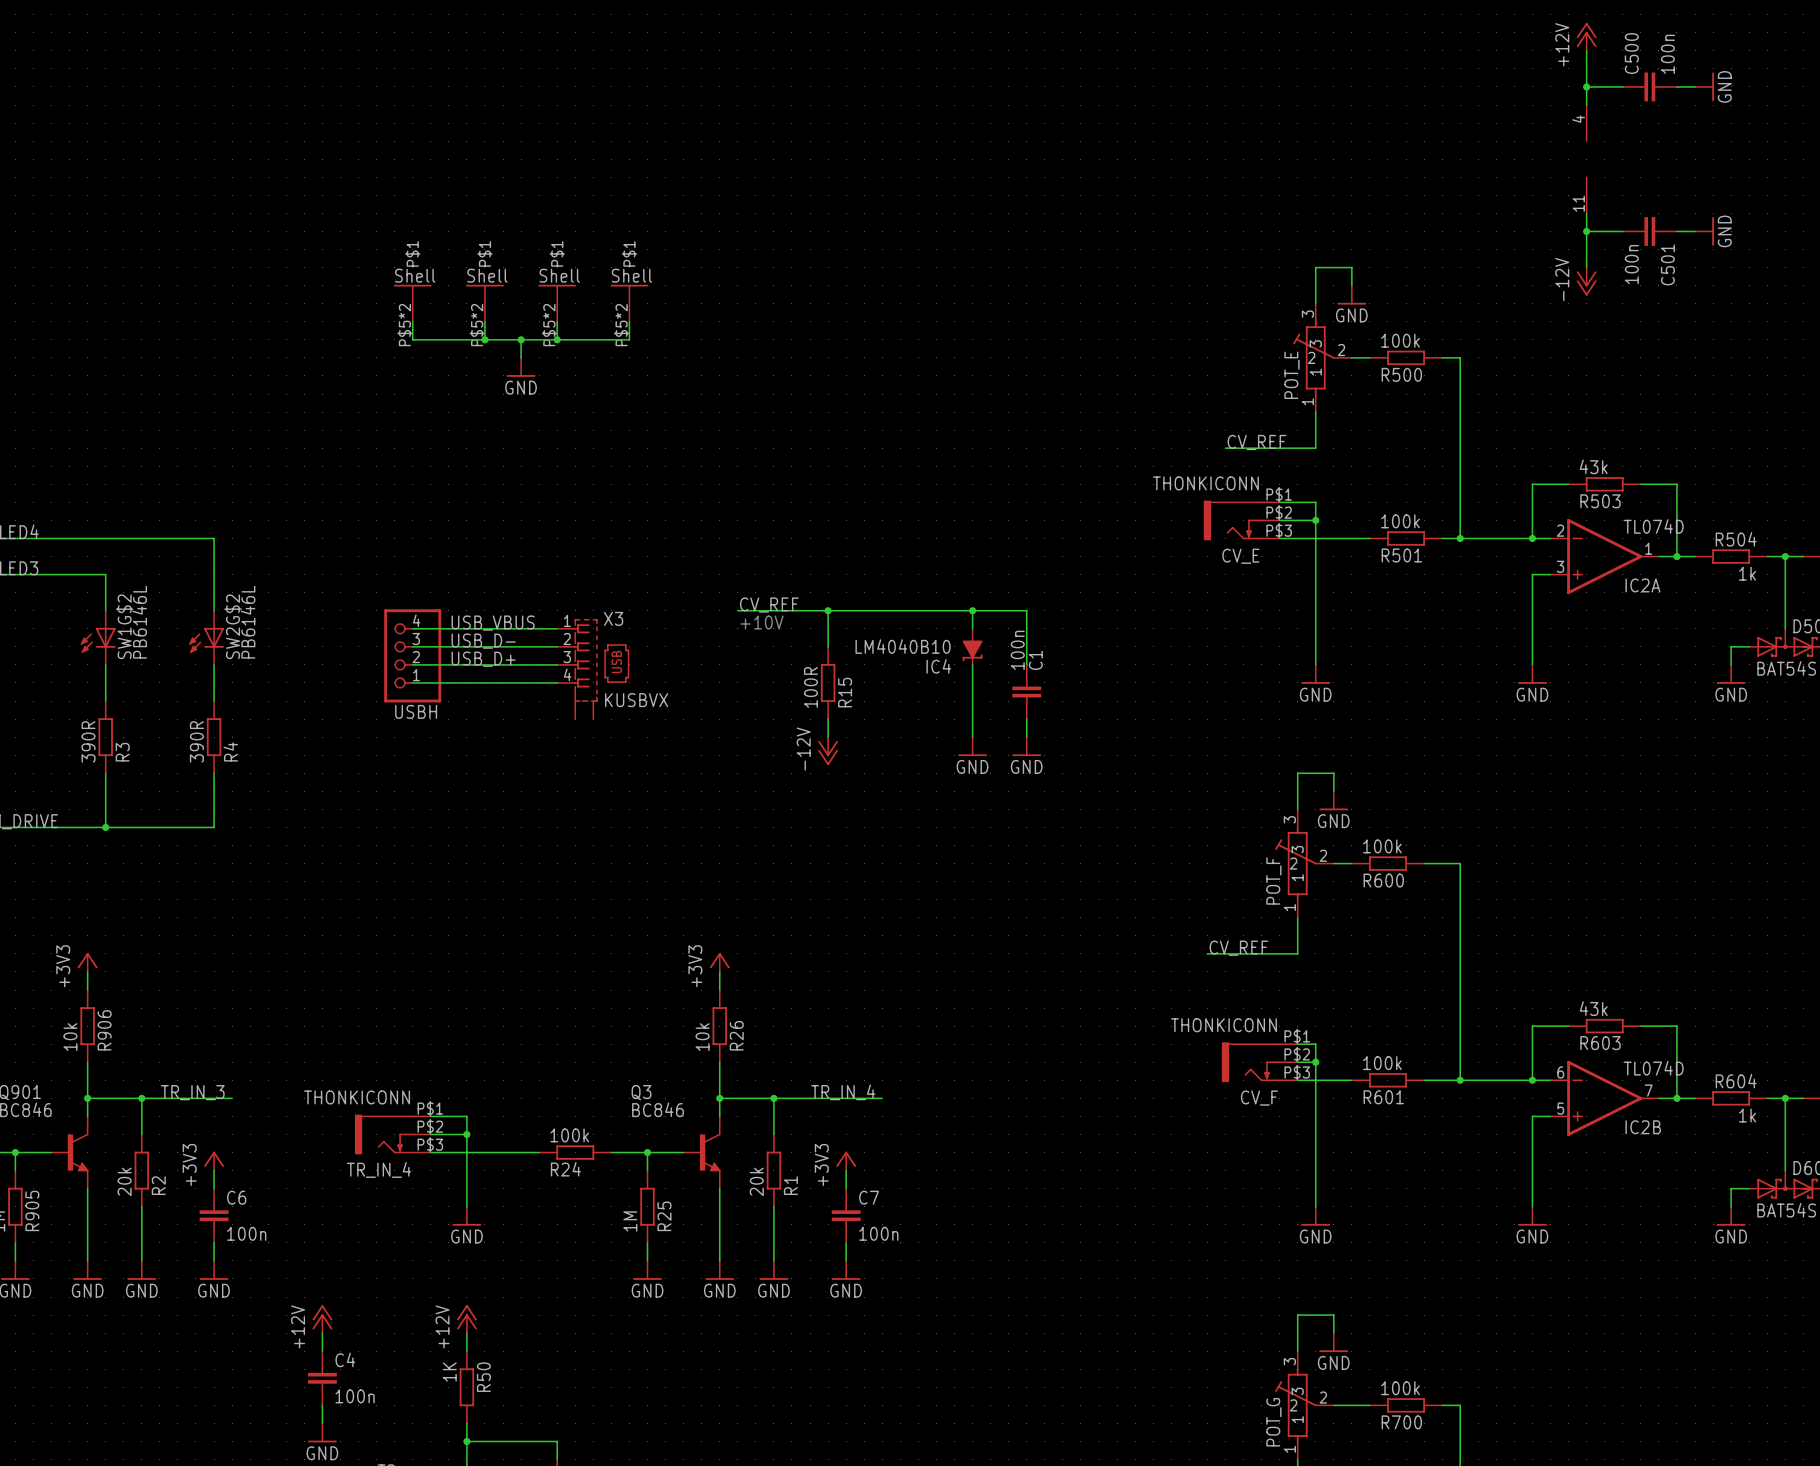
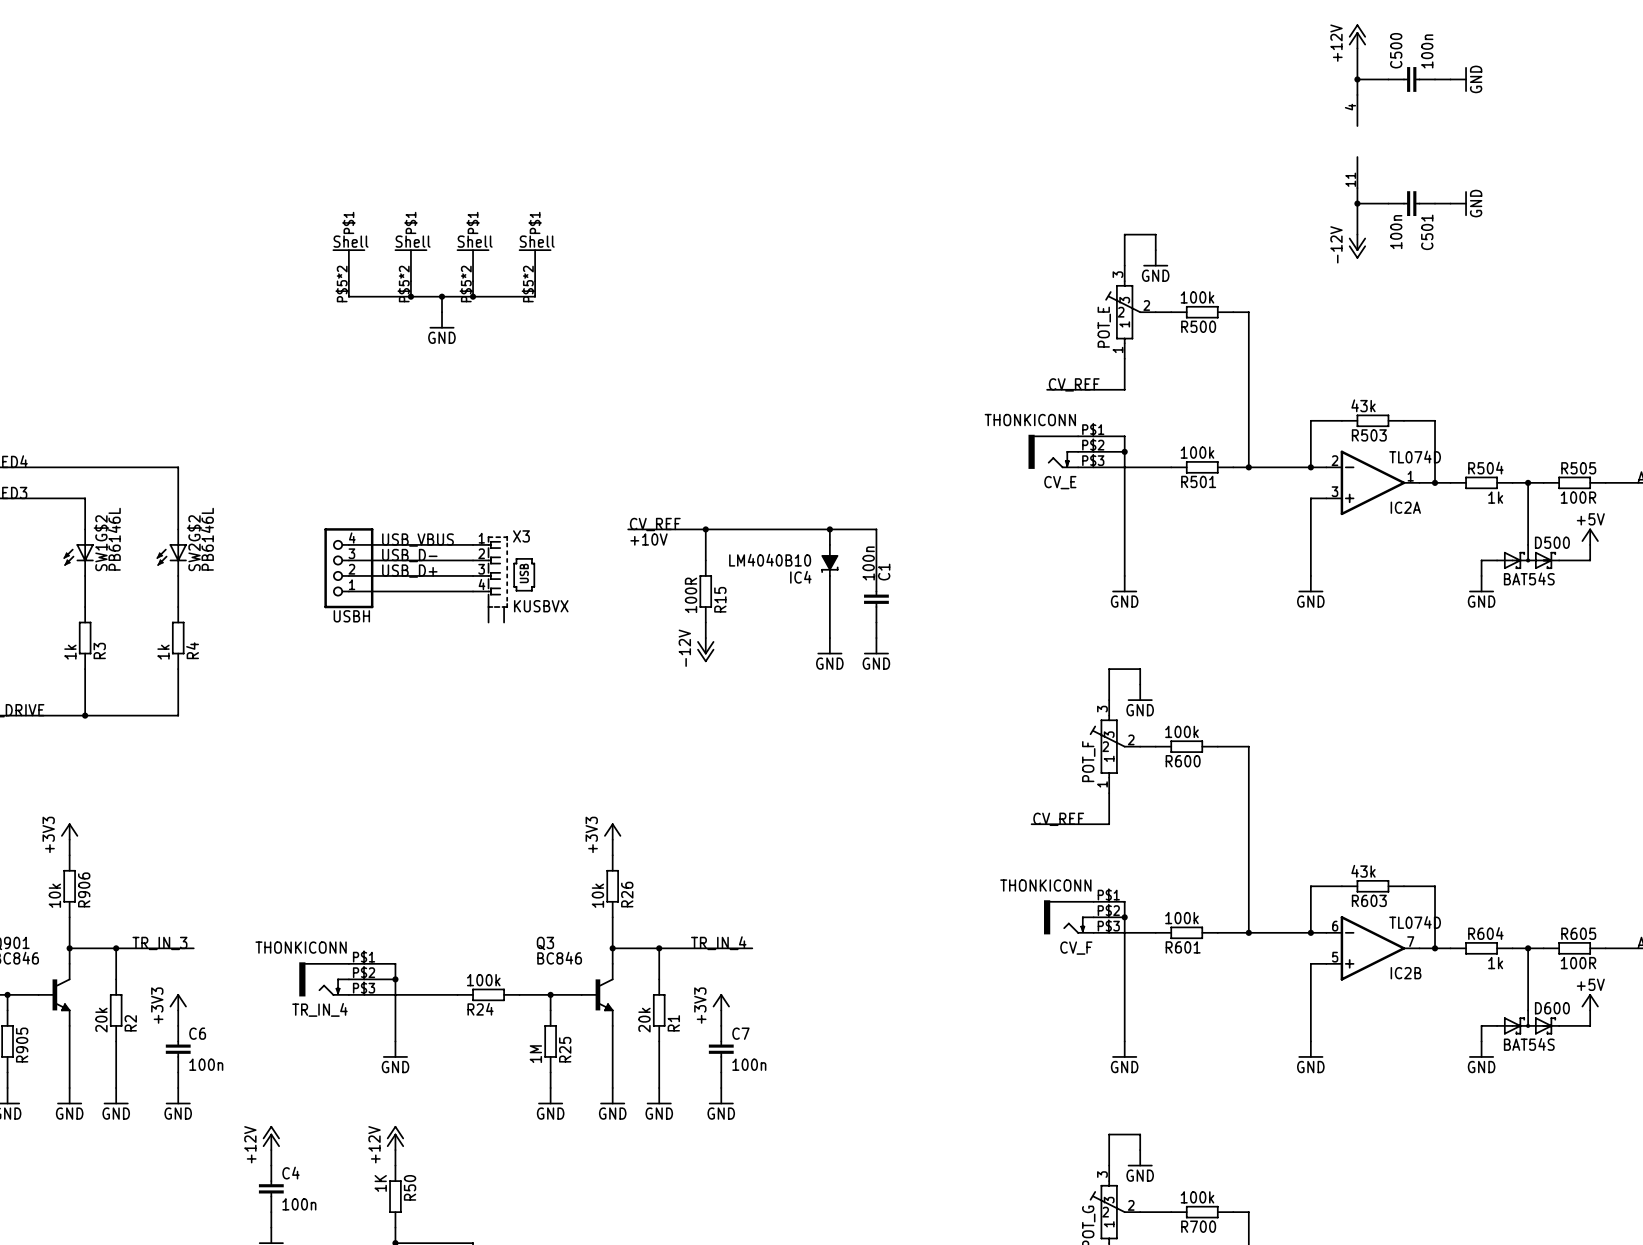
R3 value: 390R (88, 741) -> 1k (70, 652)
R4 value: 390R (196, 741) -> 1k (163, 652)

